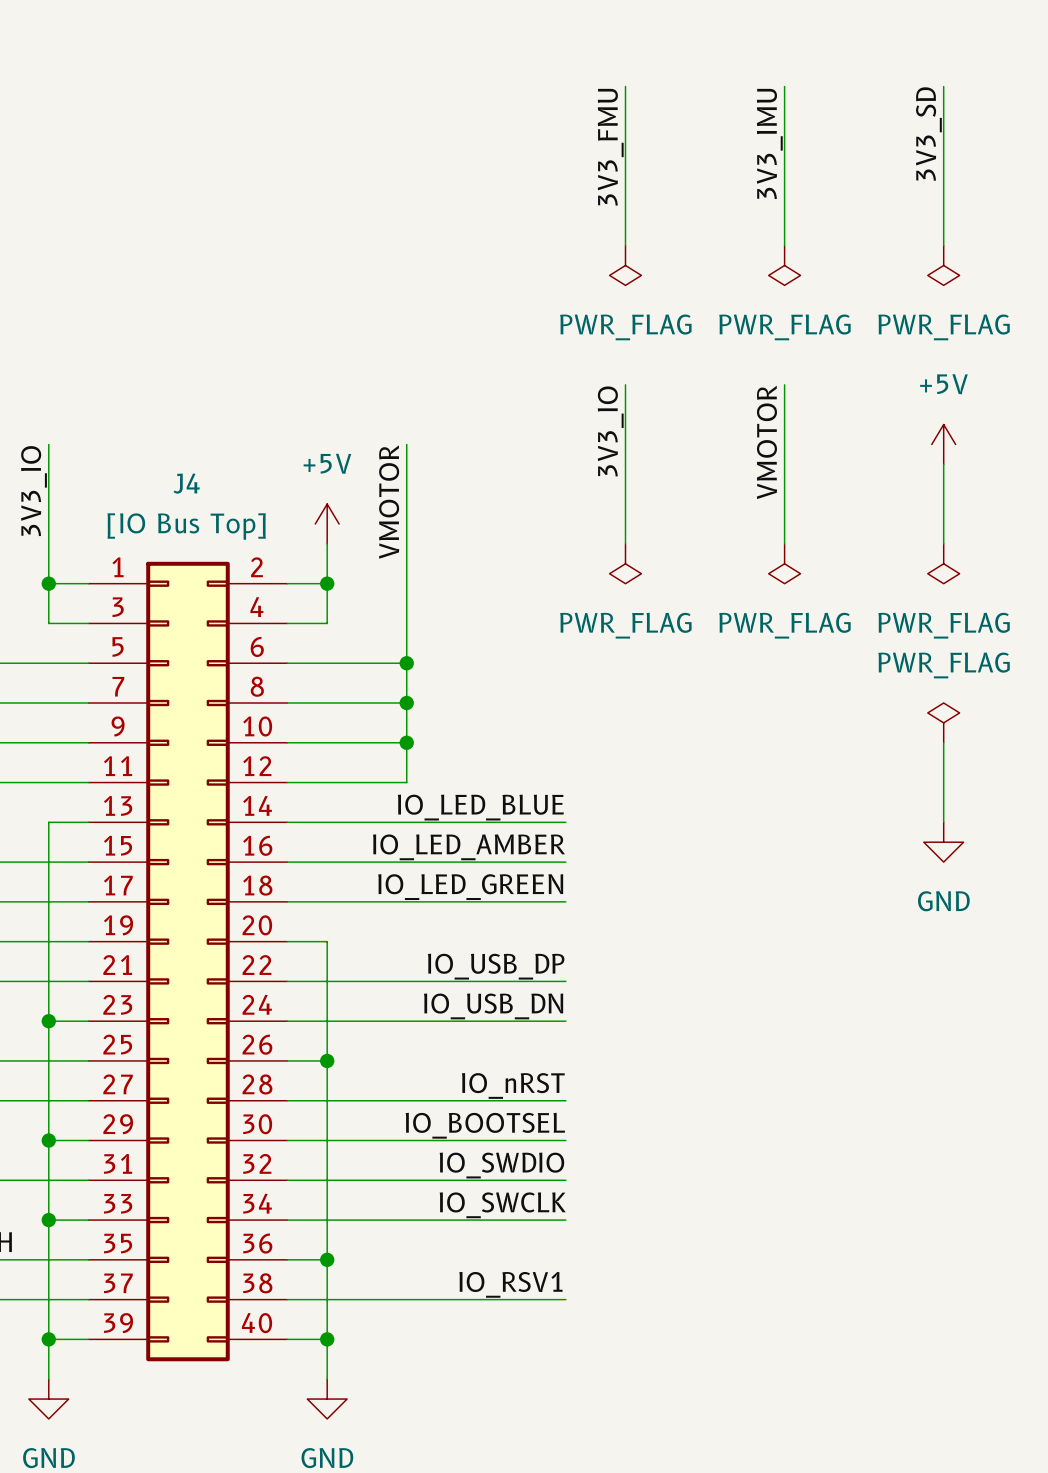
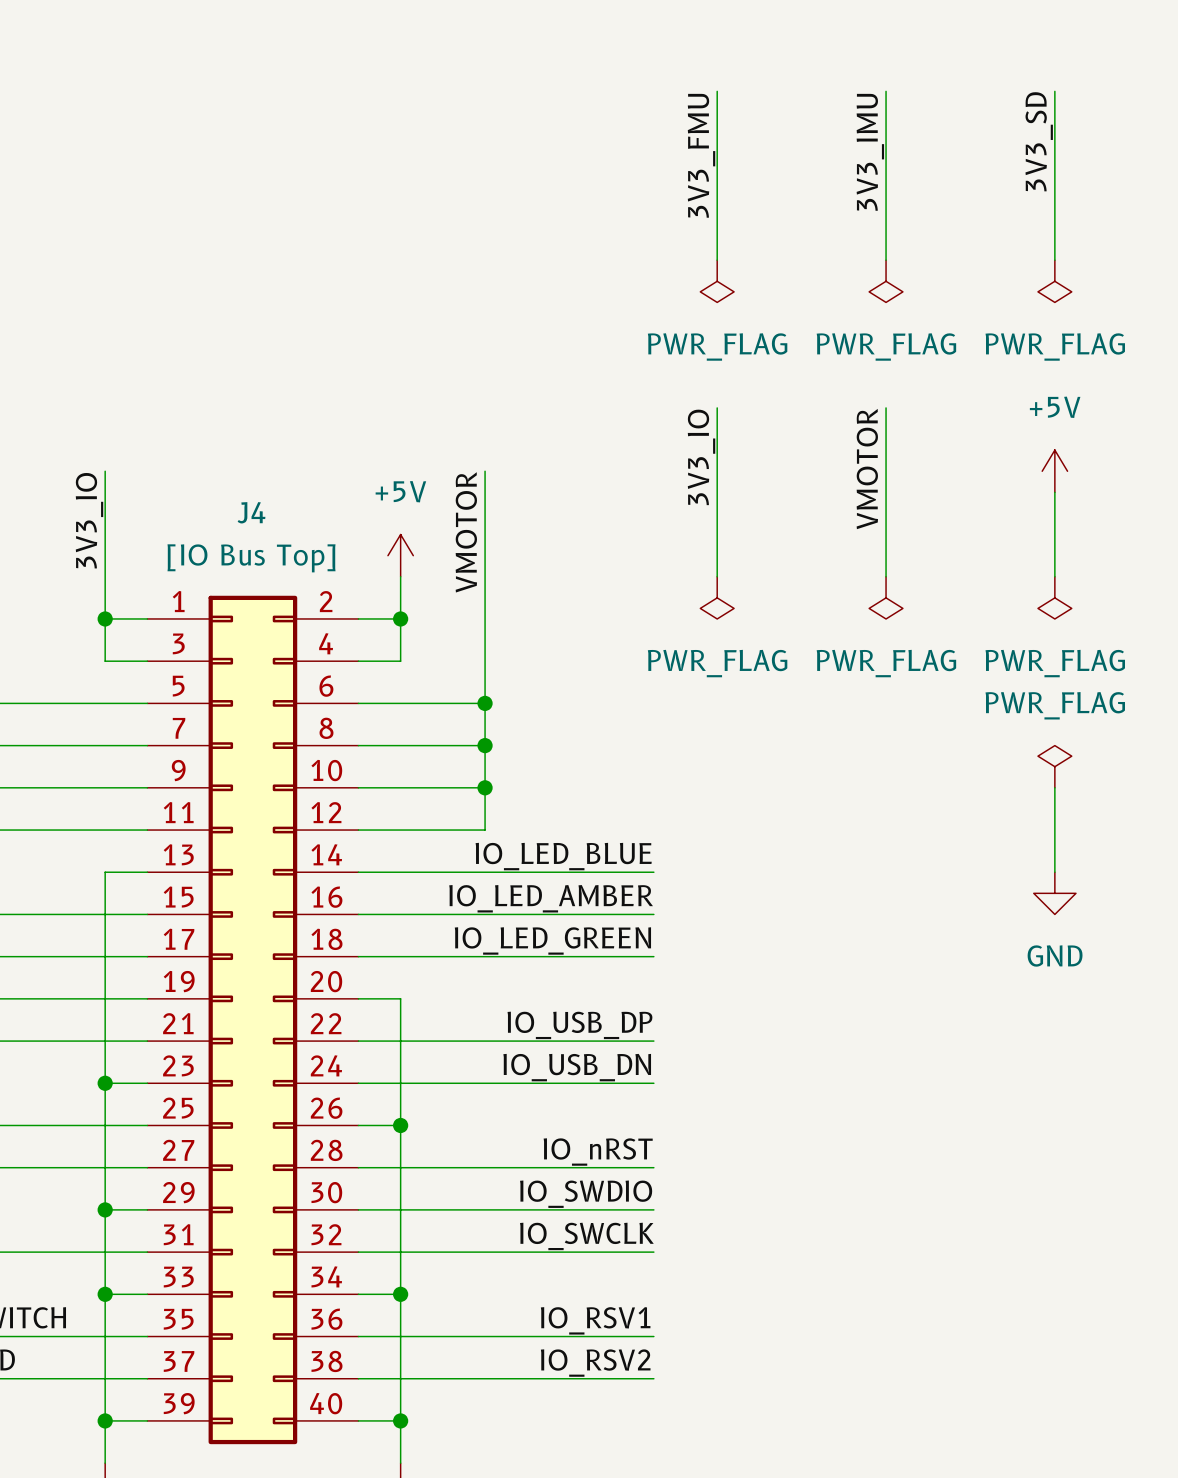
label: IO_BOOTSEL (485, 1125) -> IO_SWDIO (586, 1194)
label: IO_SWDIO (501, 1165) -> IO_SWCLK (586, 1236)
label: IO_SWCLK (502, 1205) -> none
wire: (327, 1220) (565, 1220) -> (400, 1336) (653, 1336)
label: none -> IO_RSV1 (595, 1320)
junction position: (327, 1259) -> (400, 1294)
label: IO_RSV1 (510, 1284) -> IO_RSV2 (595, 1363)

